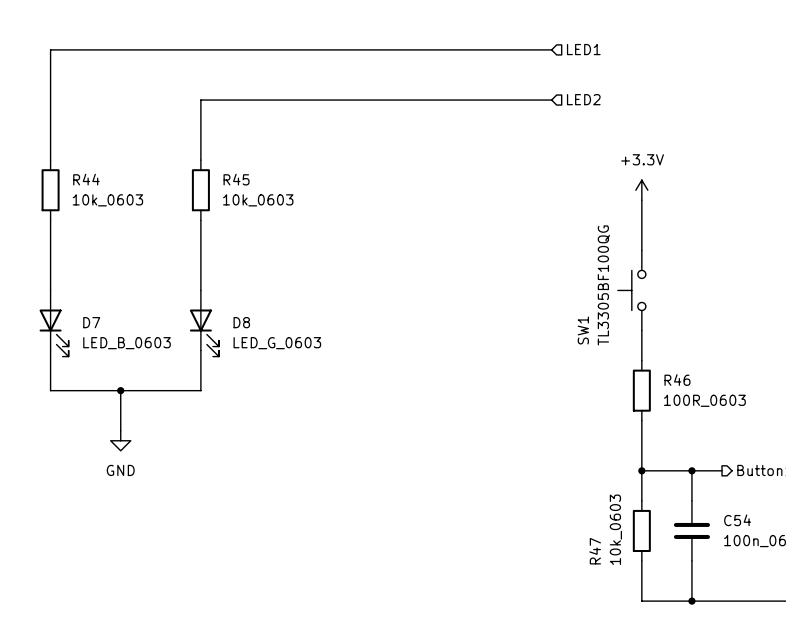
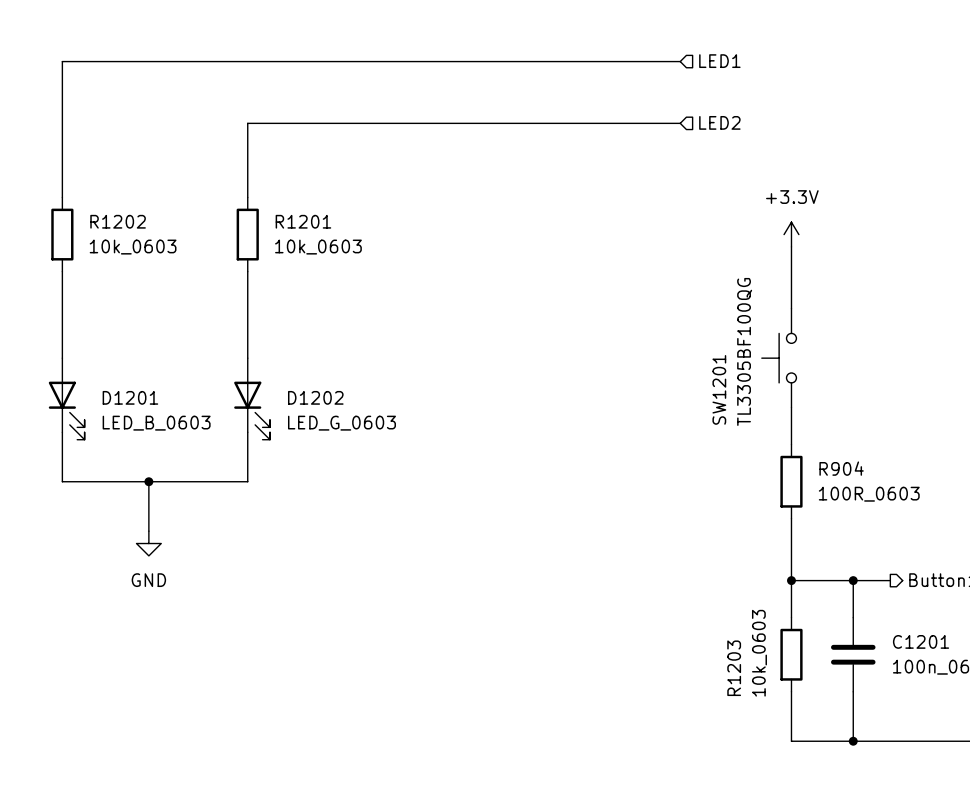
R44 name: R44 (86, 179) -> R1202 (118, 221)
R45 name: R45 (236, 179) -> R1201 (303, 221)
D7 name: D7 (91, 322) -> D1201 (130, 397)
D8 name: D8 (241, 322) -> D1202 (315, 397)
SW1 name: SW1 (583, 330) -> SW1201 (719, 389)
R46 name: R46 (677, 380) -> R904 (841, 468)
C54 name: C54 (737, 520) -> C1201 (921, 641)
R47 name: R47 (595, 551) -> R1203 (734, 668)

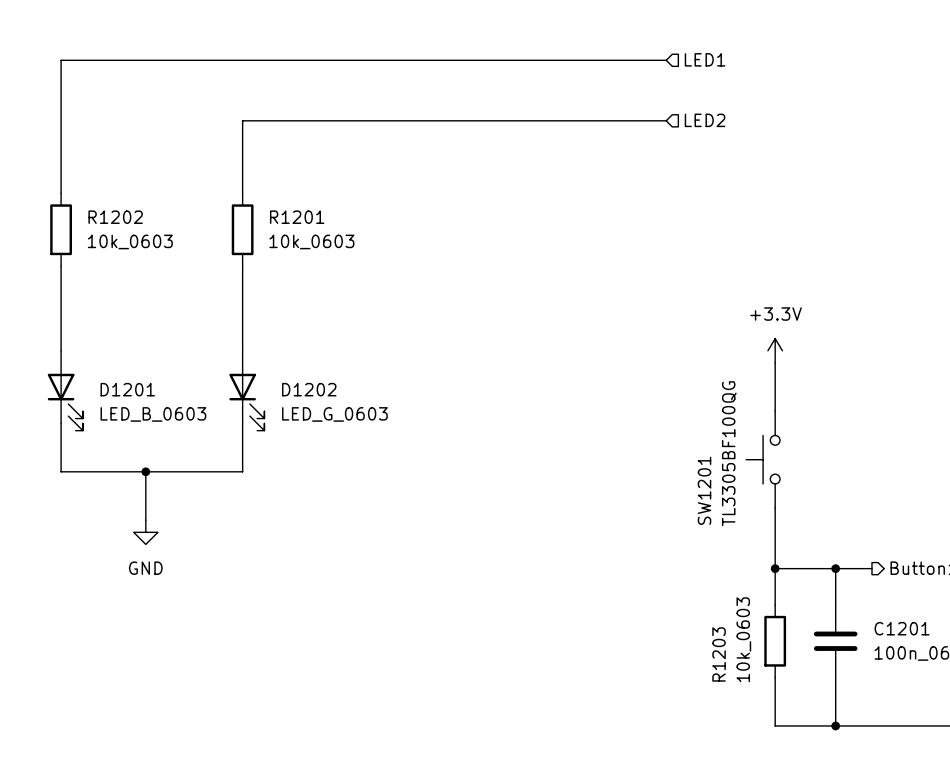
power symbol position: +3.3V (791, 234) -> +3.3V (775, 350)
wire: (791, 246) (791, 308) -> none
SW1201 position: (779, 358) -> (763, 459)
R904: 100R_0603 (791, 481) -> none

